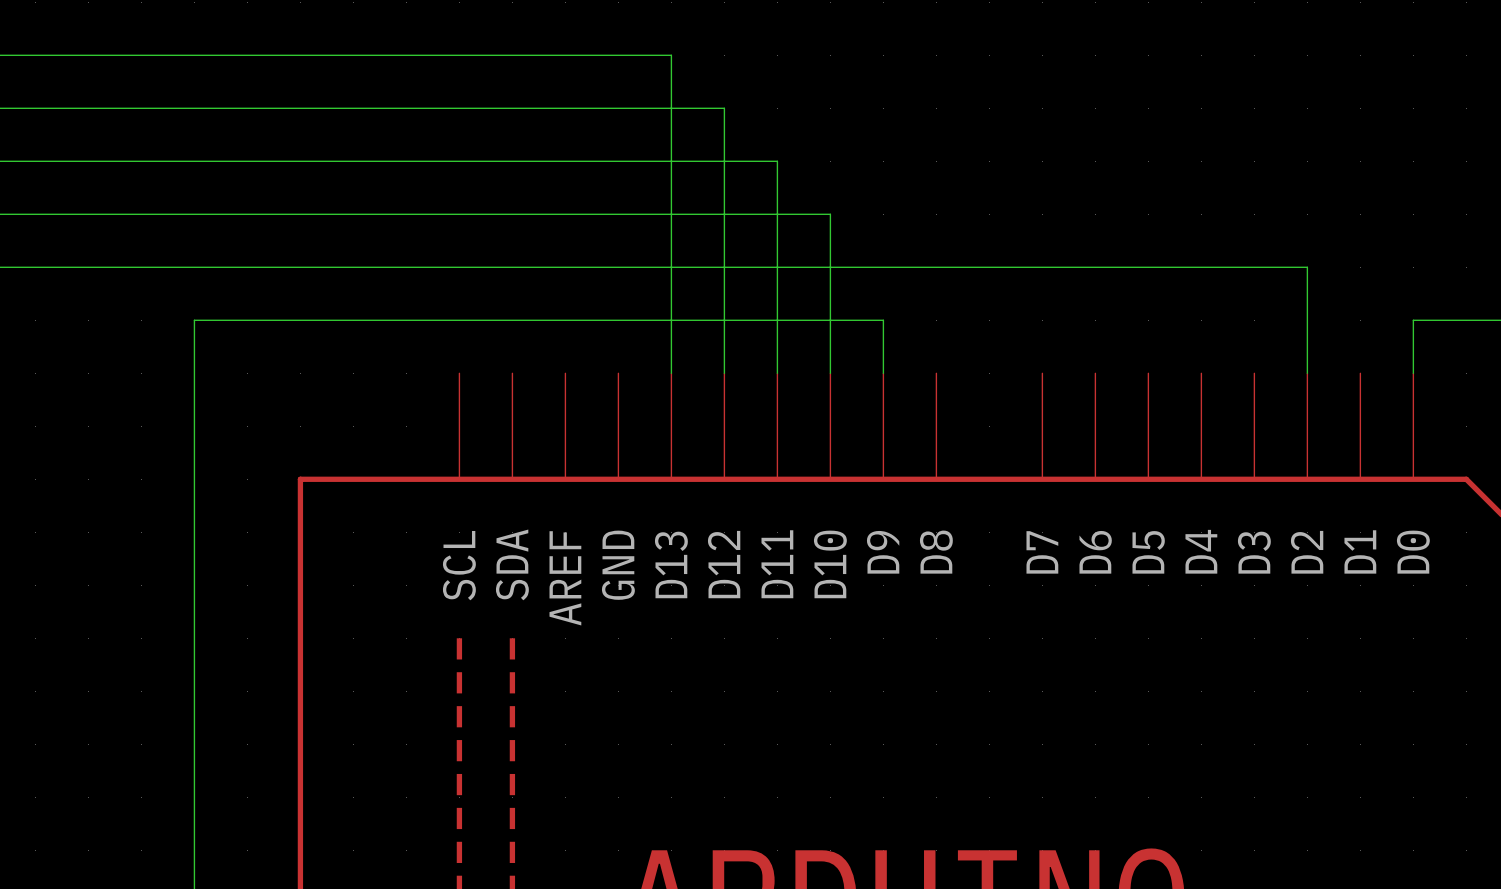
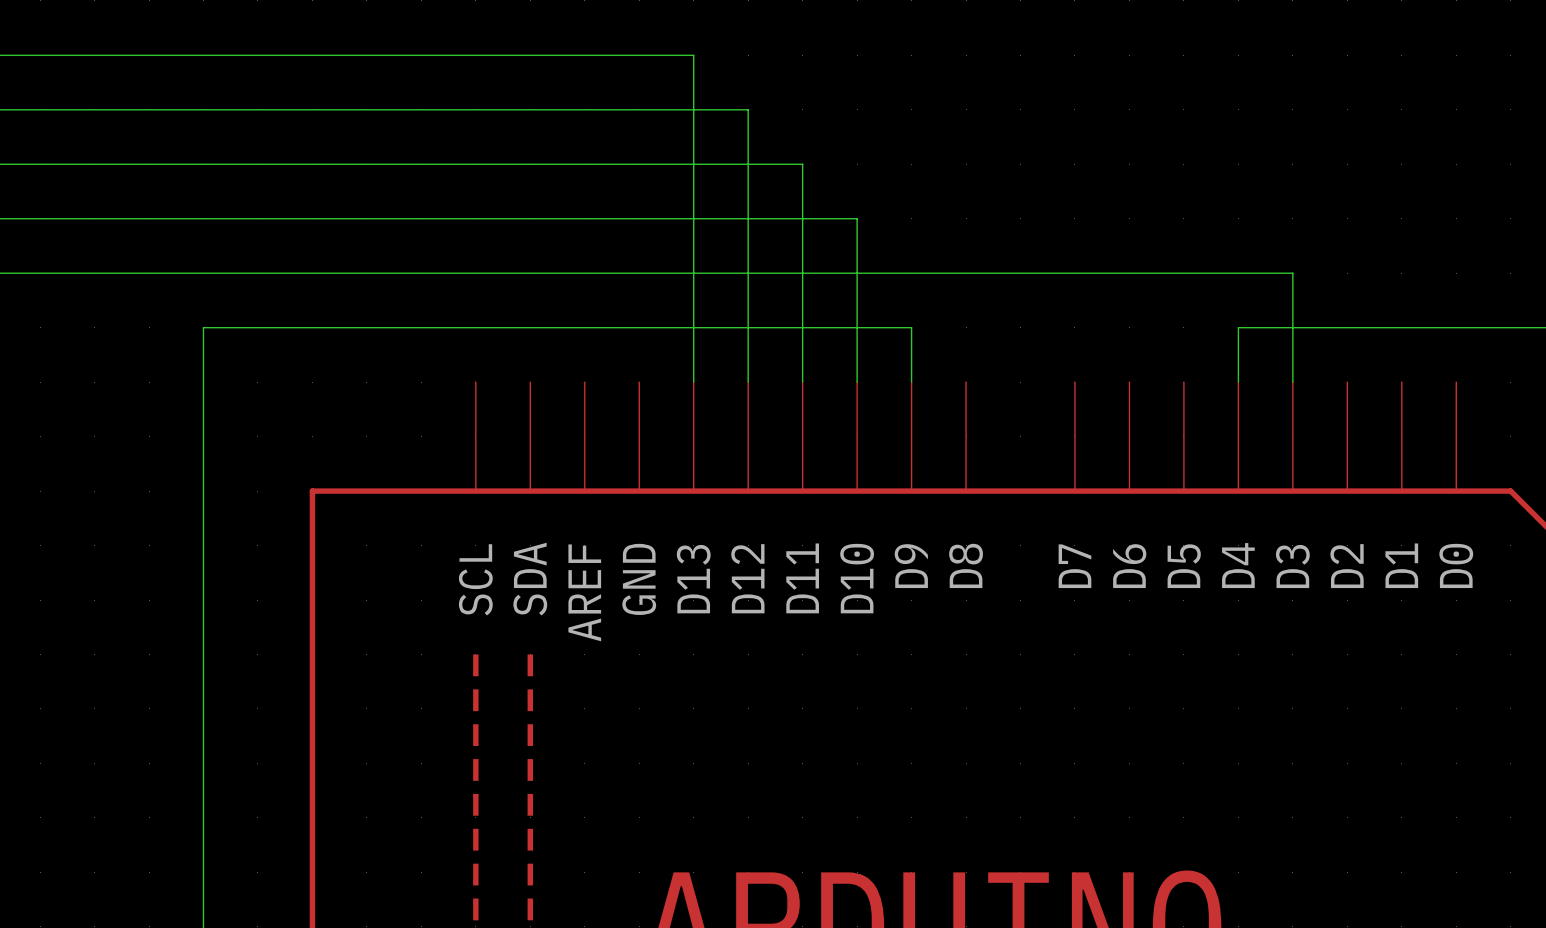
wire: (1254, 267) (1307, 267) (1307, 373) -> (1292, 273) (1292, 382)
wire: (1413, 320) (1413, 373) -> (1456, 327) (1238, 327) (1238, 382)

